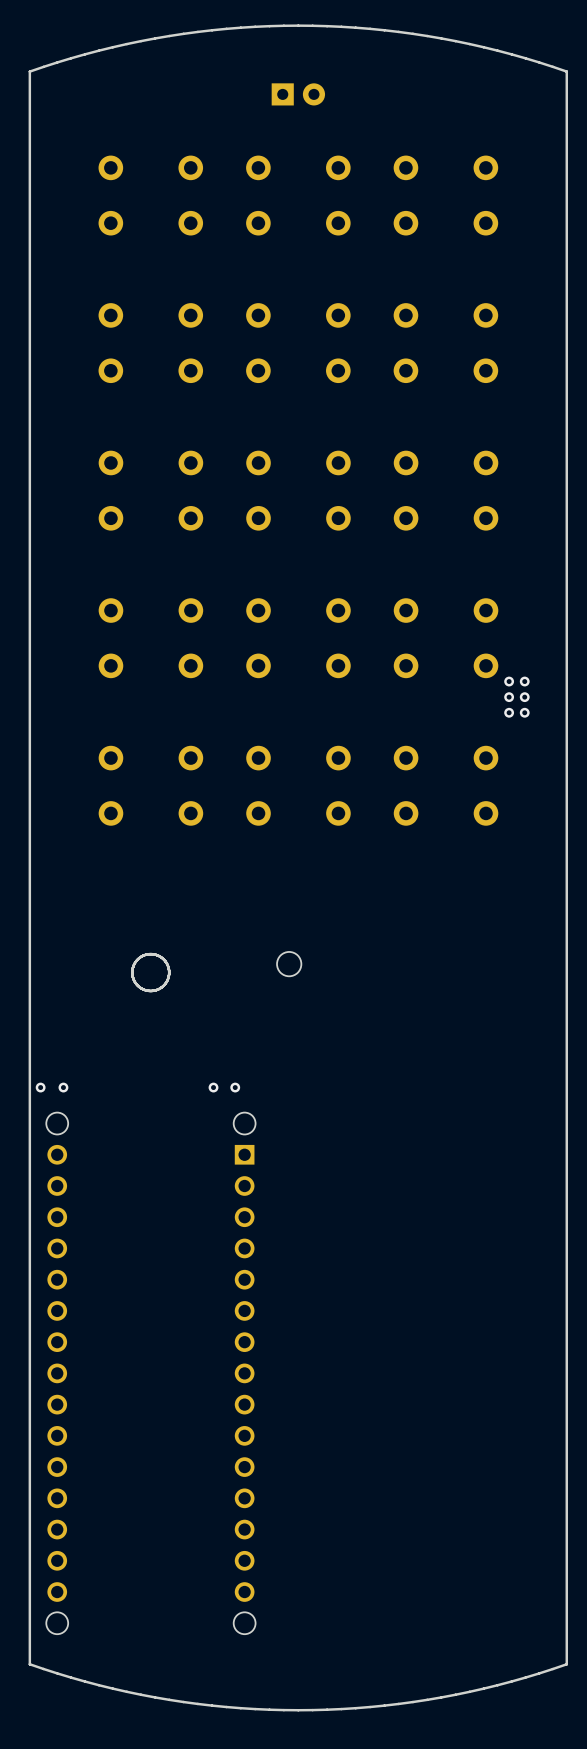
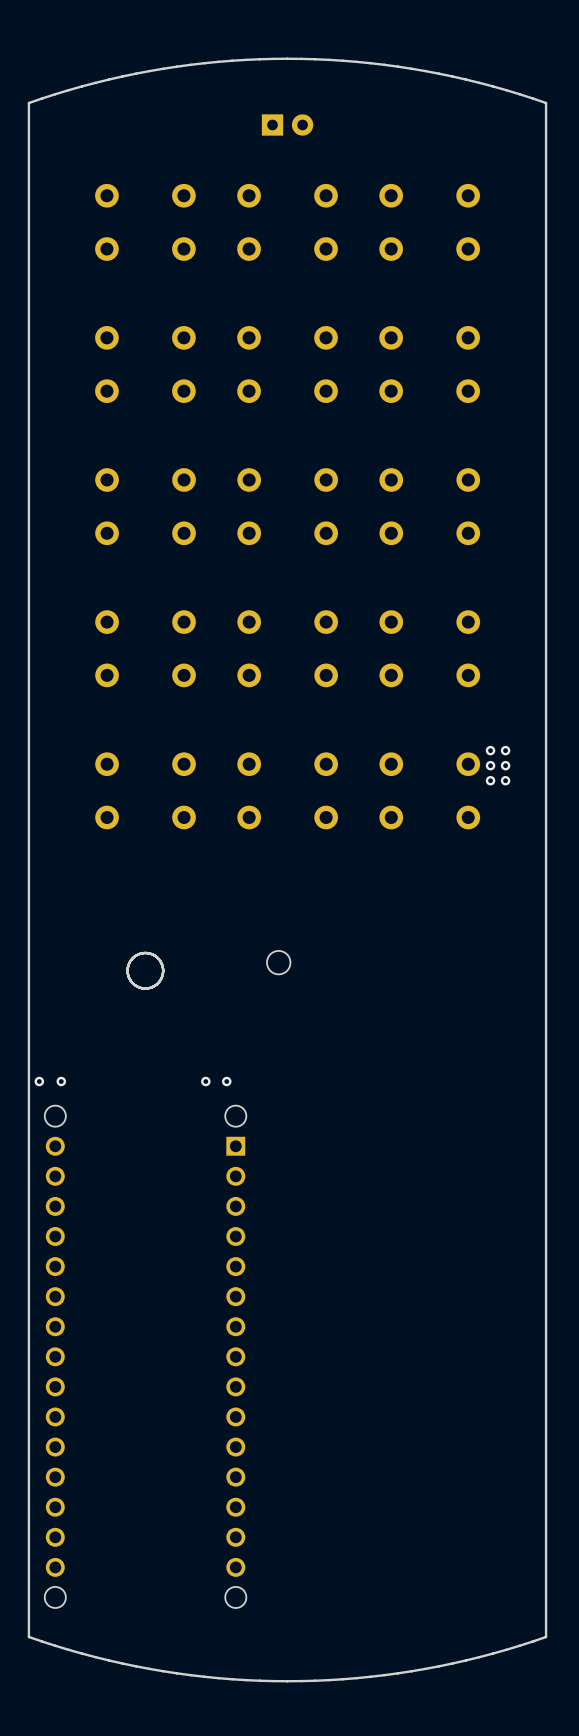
via: (509, 681) -> none
via: (524, 681) -> none
via: (509, 697) -> none
via: (524, 697) -> none
via: (509, 712) -> none
via: (524, 712) -> none
via: none -> (490, 750)
via: none -> (505, 750)
via: none -> (490, 765)
via: none -> (505, 765)
via: none -> (490, 780)
via: none -> (505, 780)

